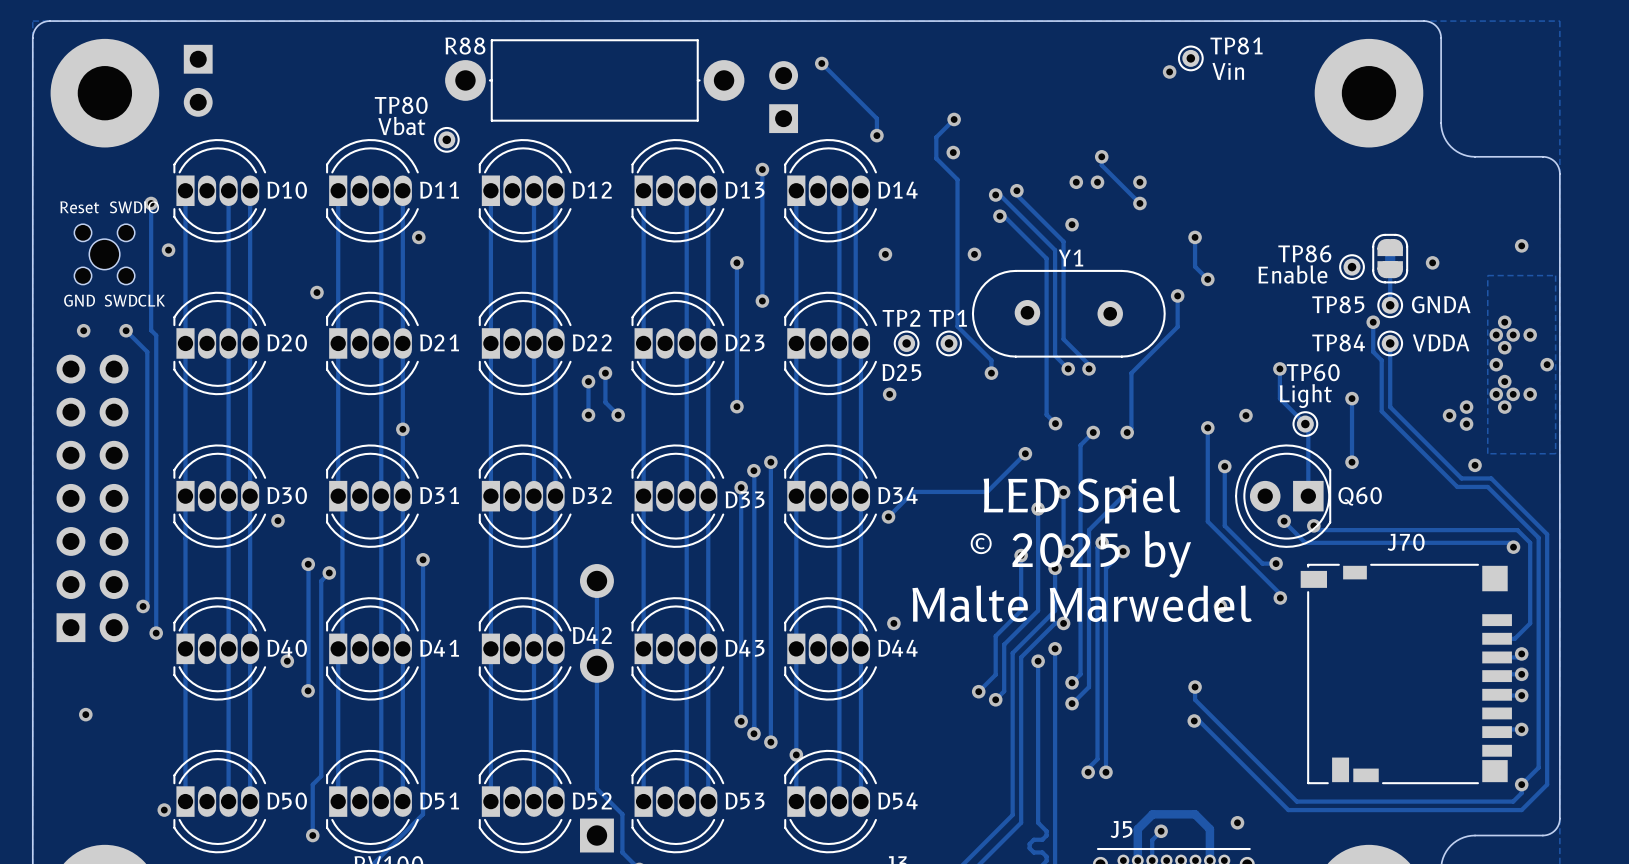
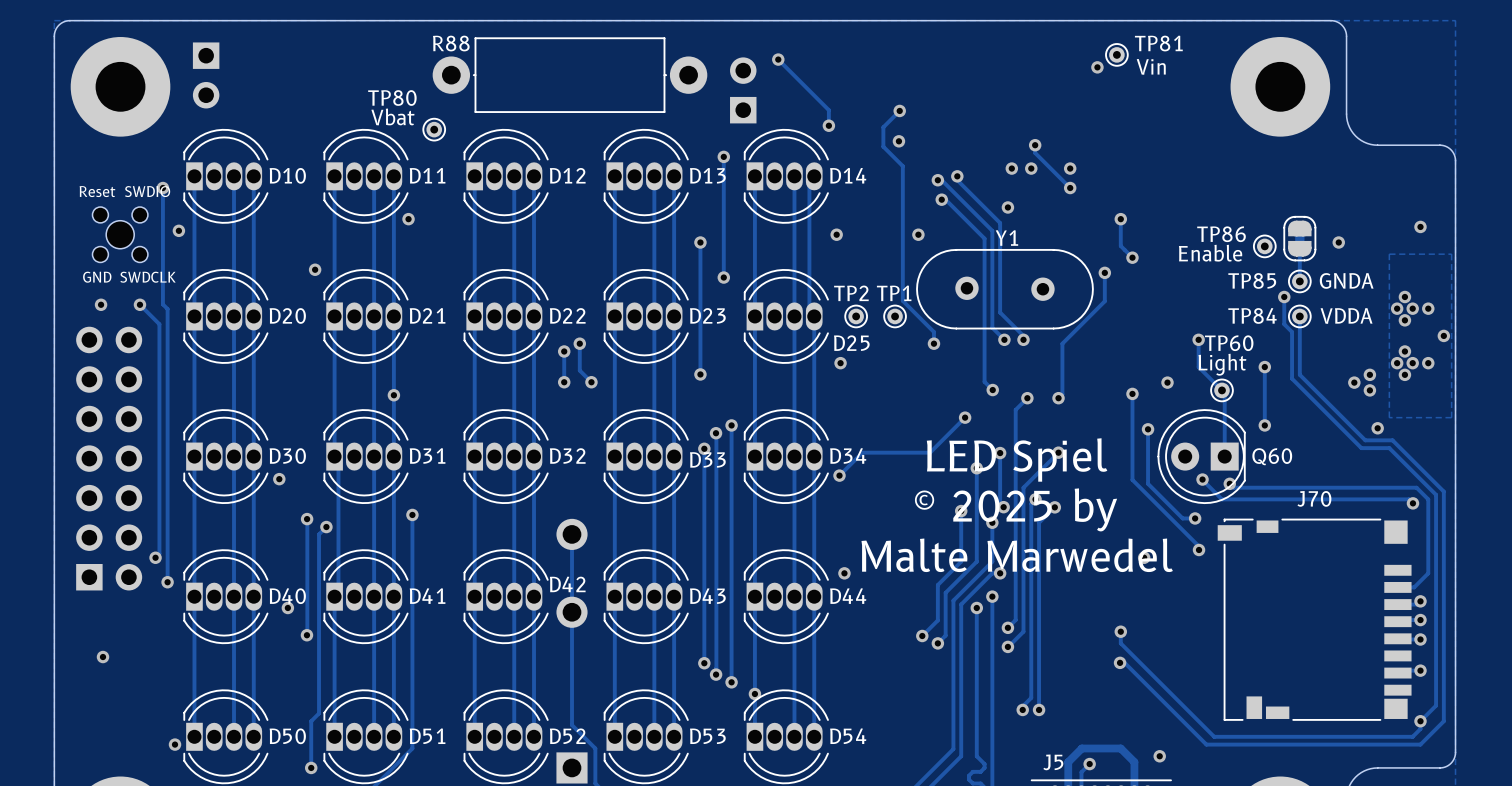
via: (1496, 364) -> none

